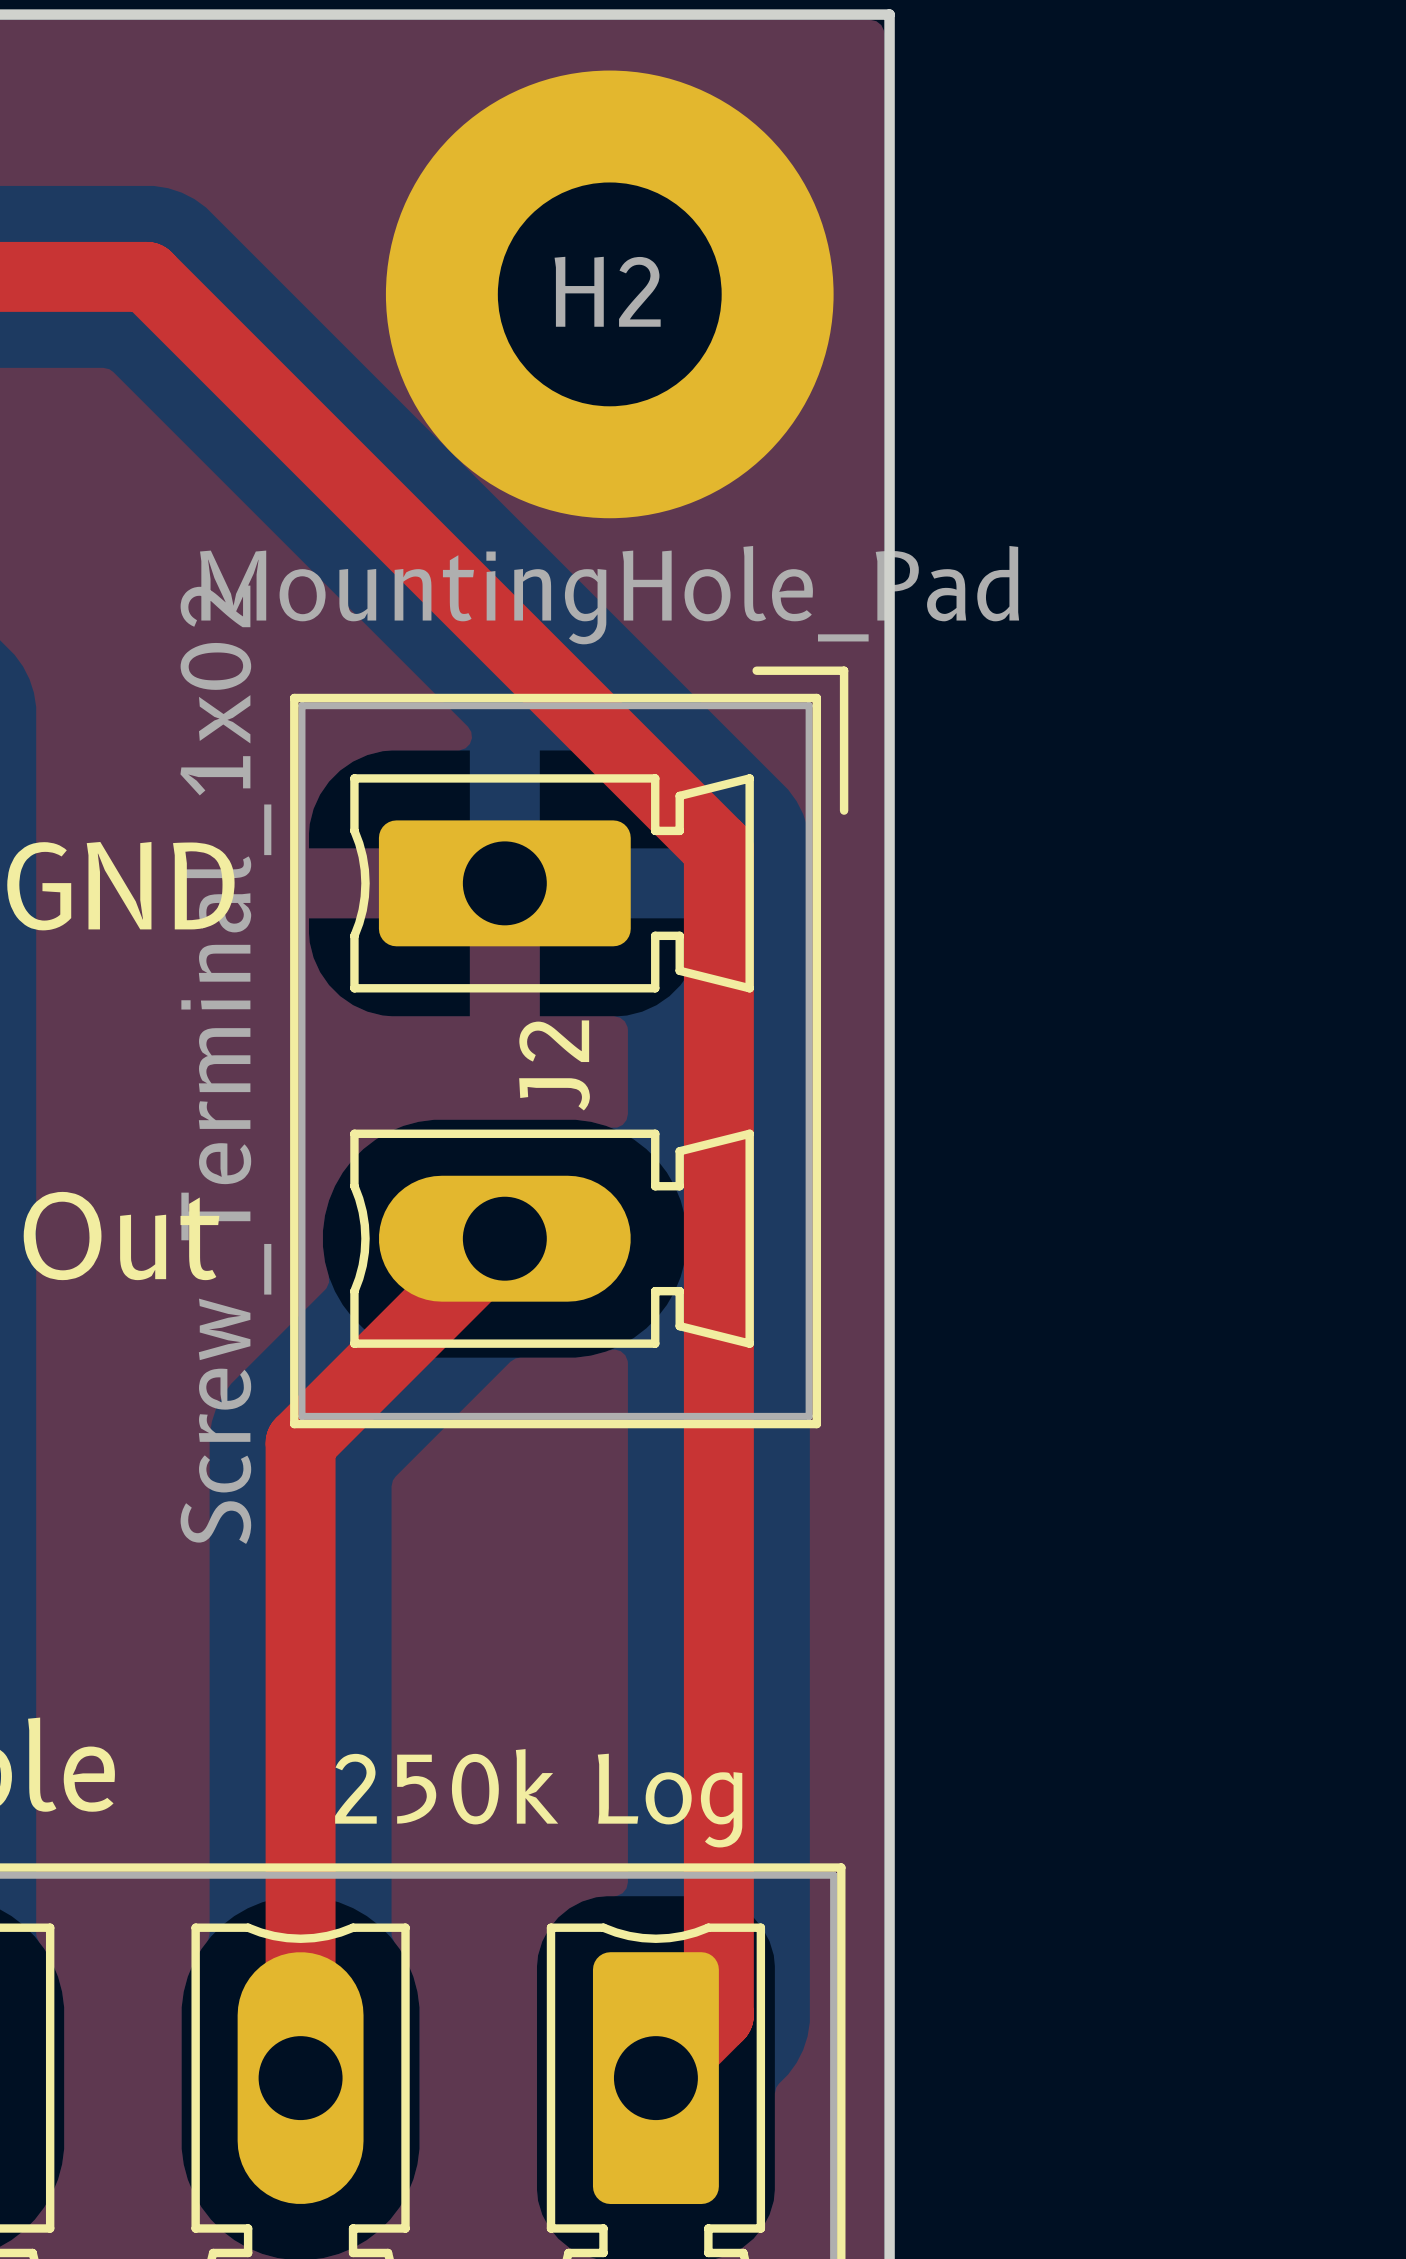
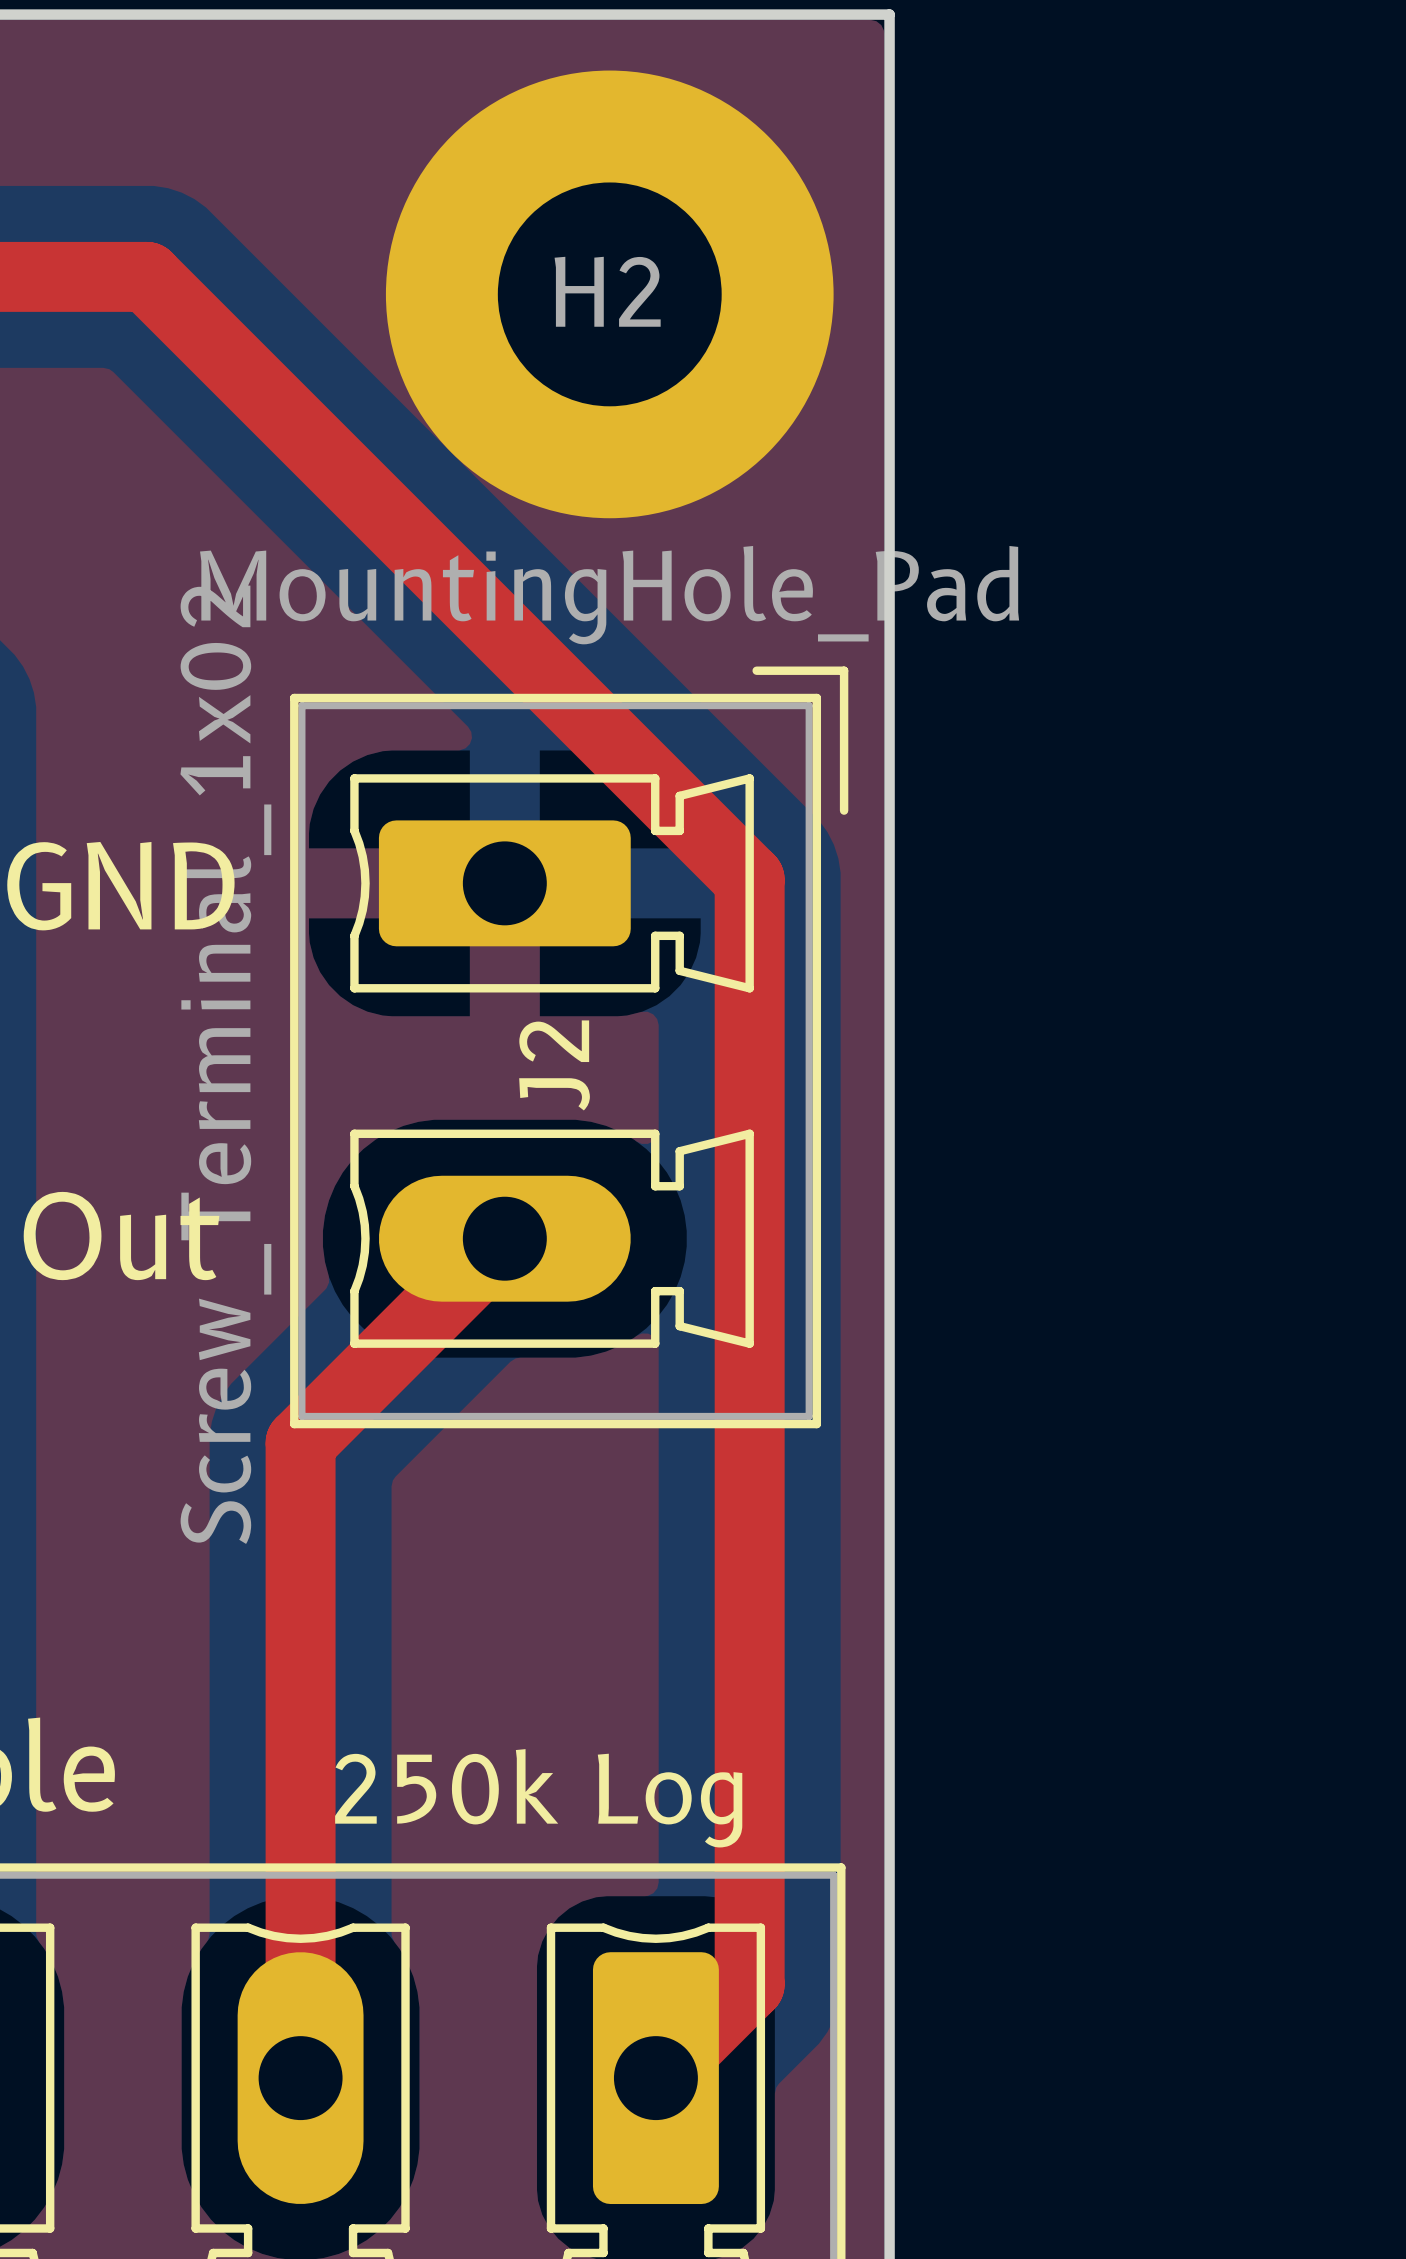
top track: (718, 848) (718, 2015) -> (718, 848) (749, 879) (749, 1984) (718, 2015)

